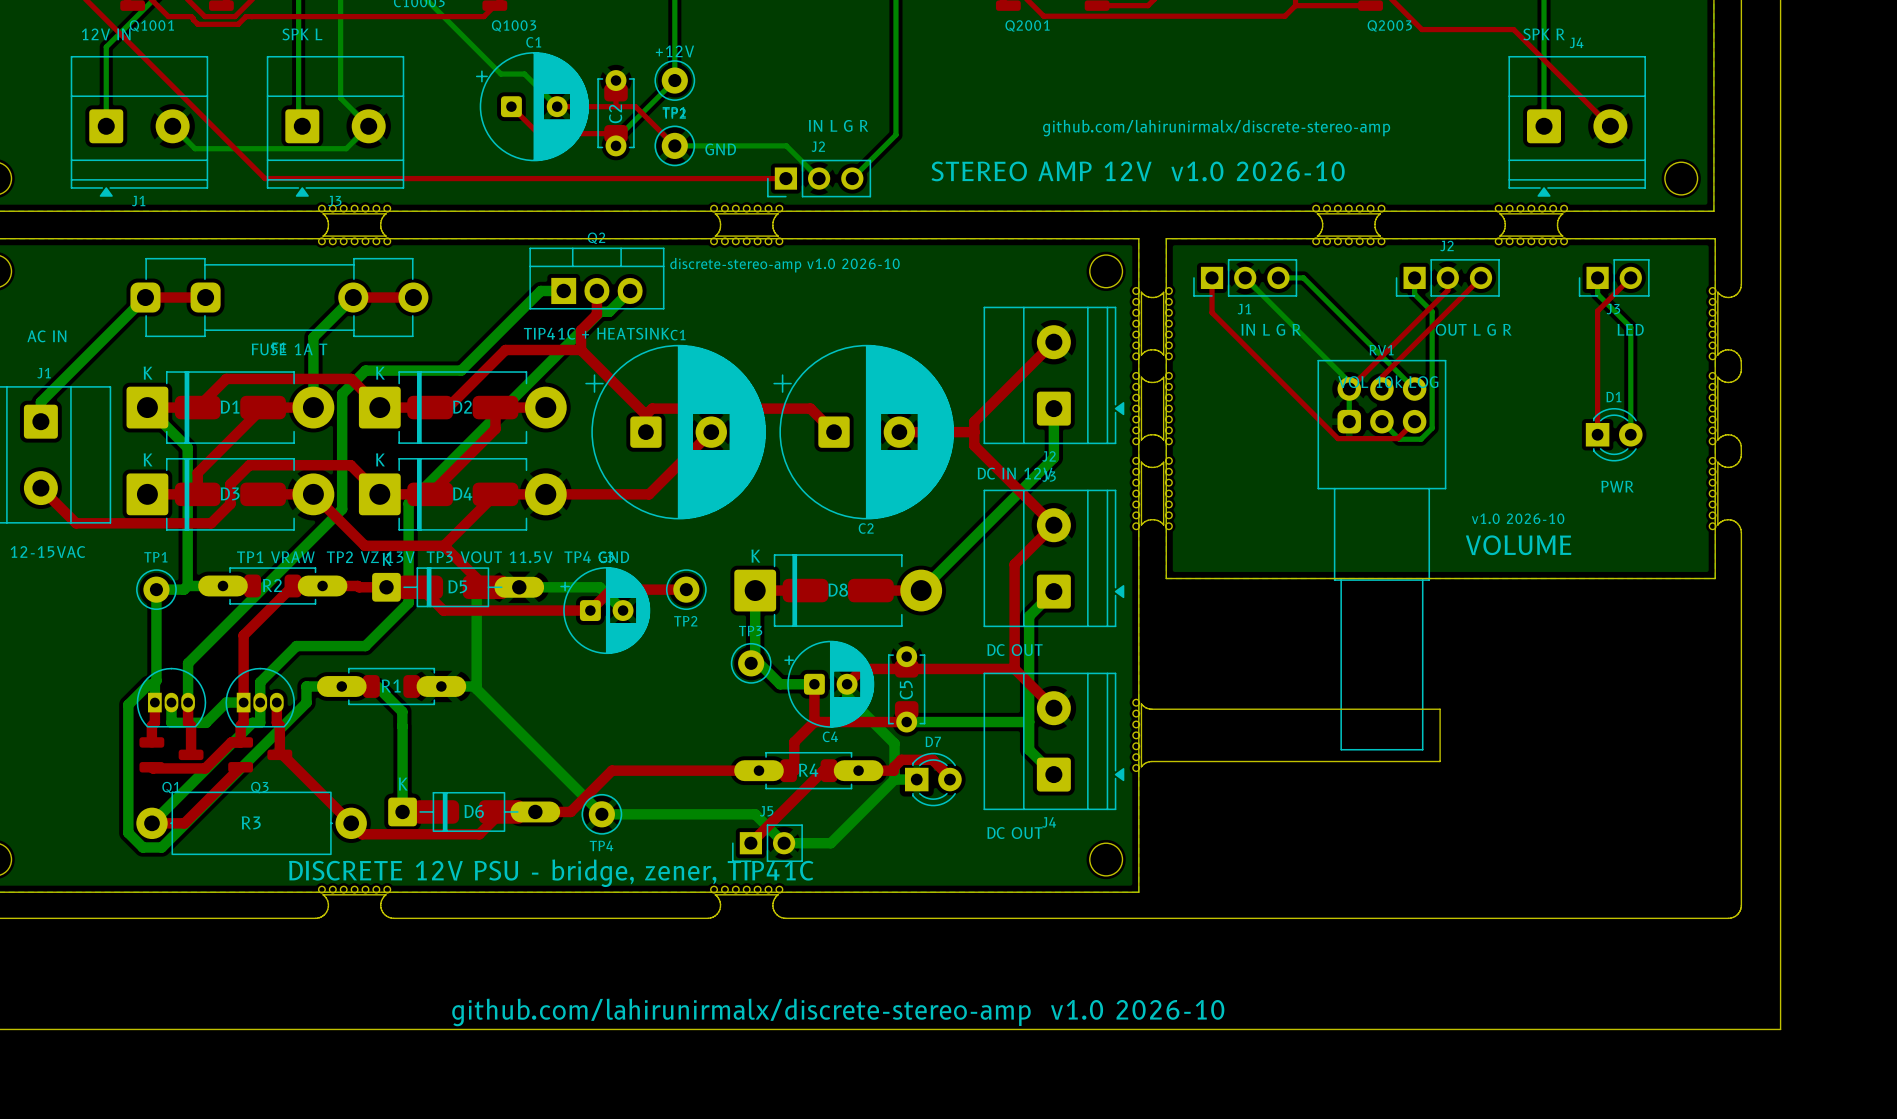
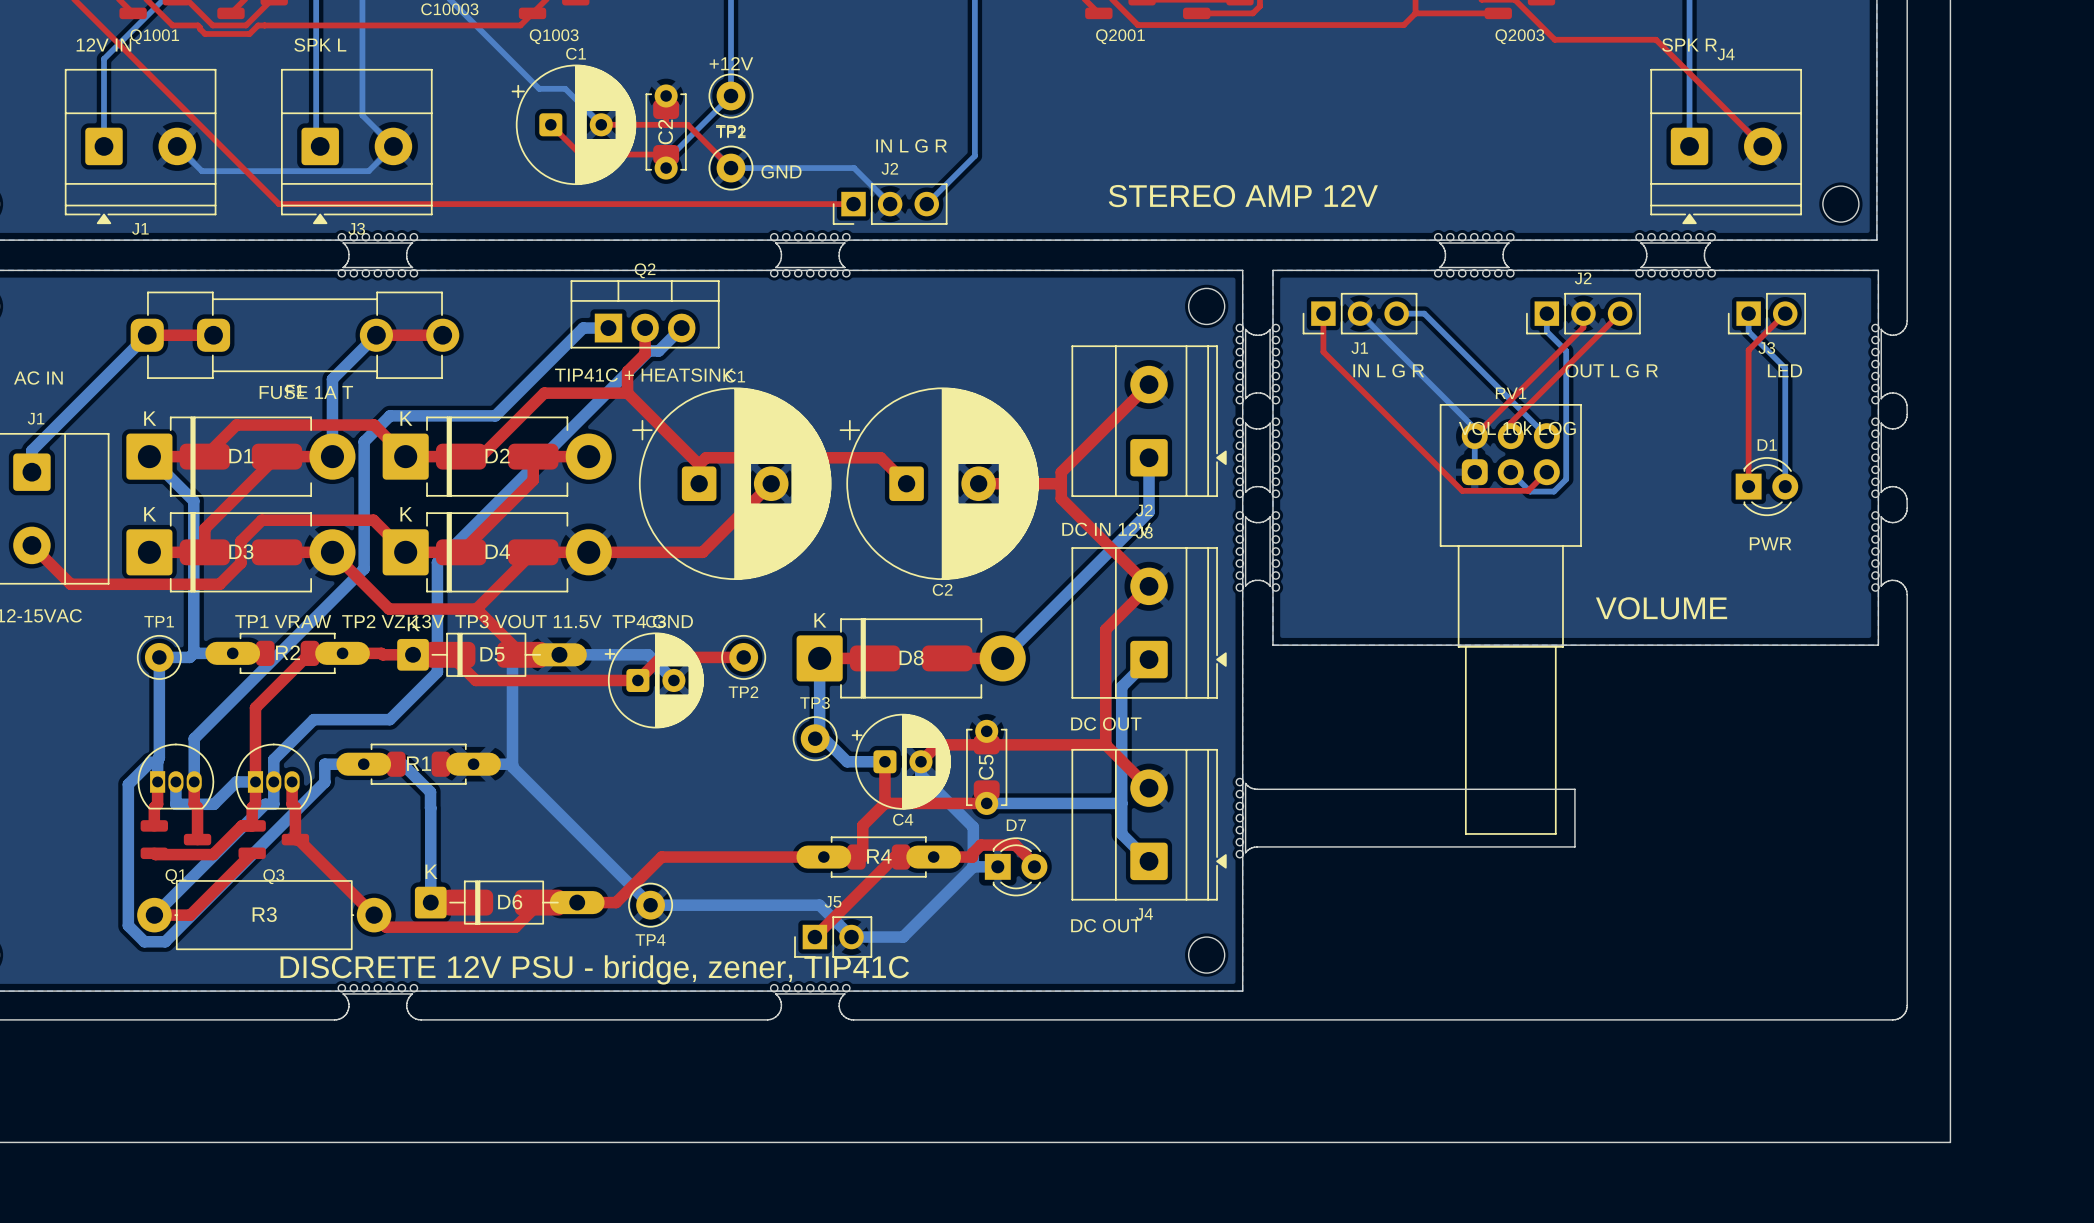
text: github.com/lahirunirmalx/discrete-stereo-amp (1216, 128) -> none
text: STEREO AMP 12V v1.0 2026-10 (1138, 171) -> STEREO AMP 12V (1243, 196)
text: discrete-stereo-amp v1.0 2026-10 (784, 265) -> none
text: v1.0 2026-10 (1518, 518) -> none
text: github.com/lahirunirmalx/discrete-stereo-amp v1.0 2026-10 (838, 1012) -> none

